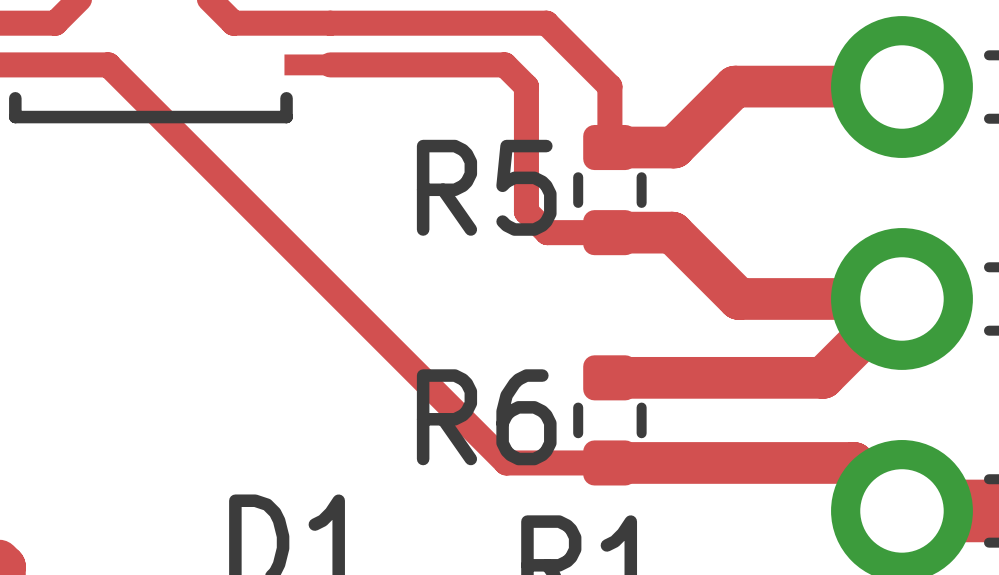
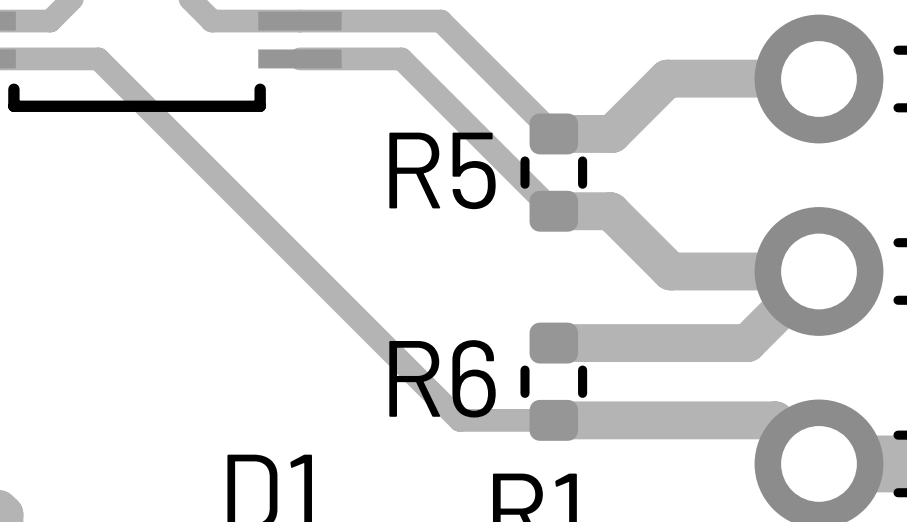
track: (485, 23) (546, 23) (609, 86) (609, 147) -> (440, 21) (553, 133)
track: (442, 64) (504, 64) (526, 86) (526, 211) (547, 232) (609, 232) -> (401, 58) (553, 211)

